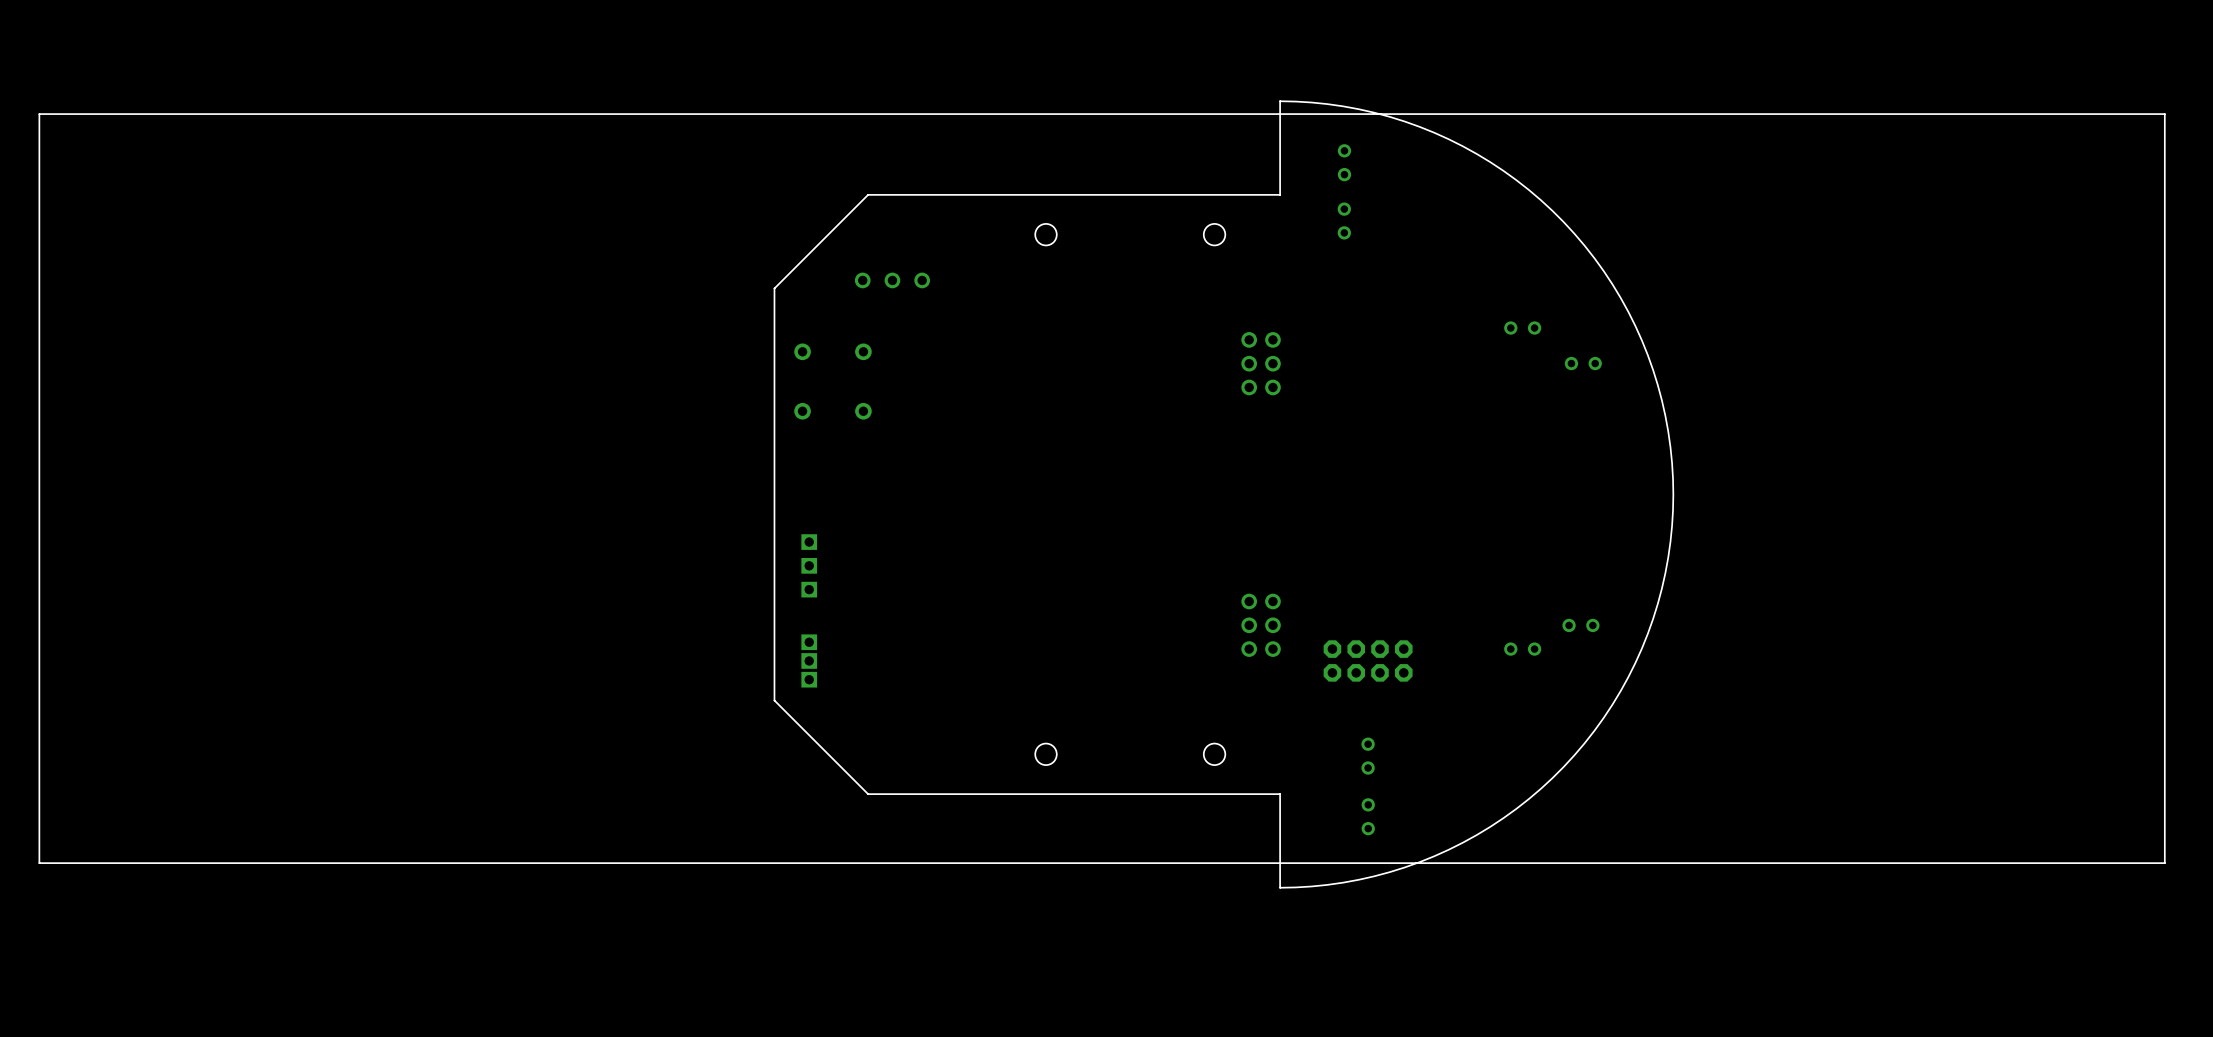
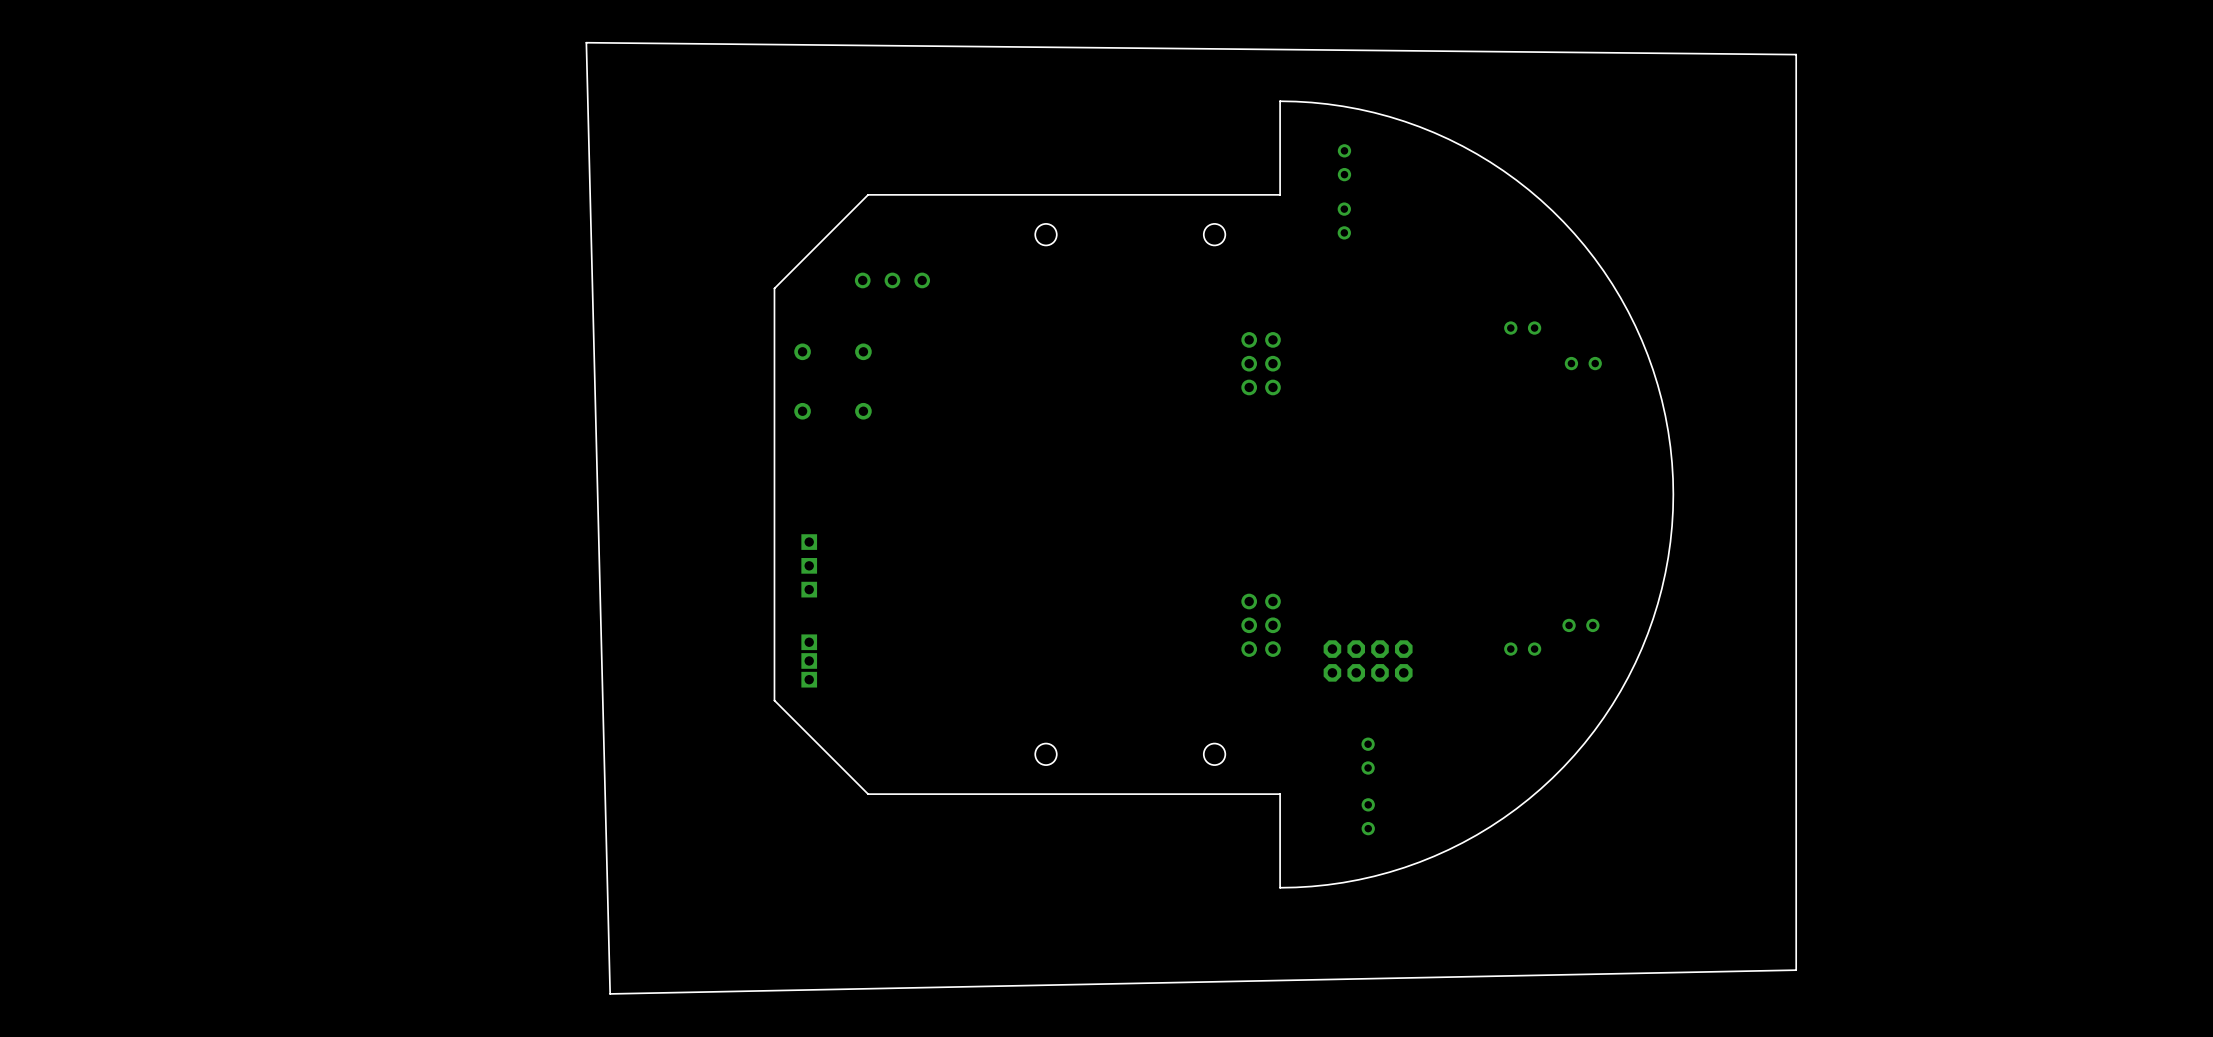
board edge: none -> (586, 42) (610, 993) (1796, 970) (1796, 54) (586, 42)
board edge: (2164, 114) (39, 114) (39, 863) (2164, 863) (2164, 114) -> none

